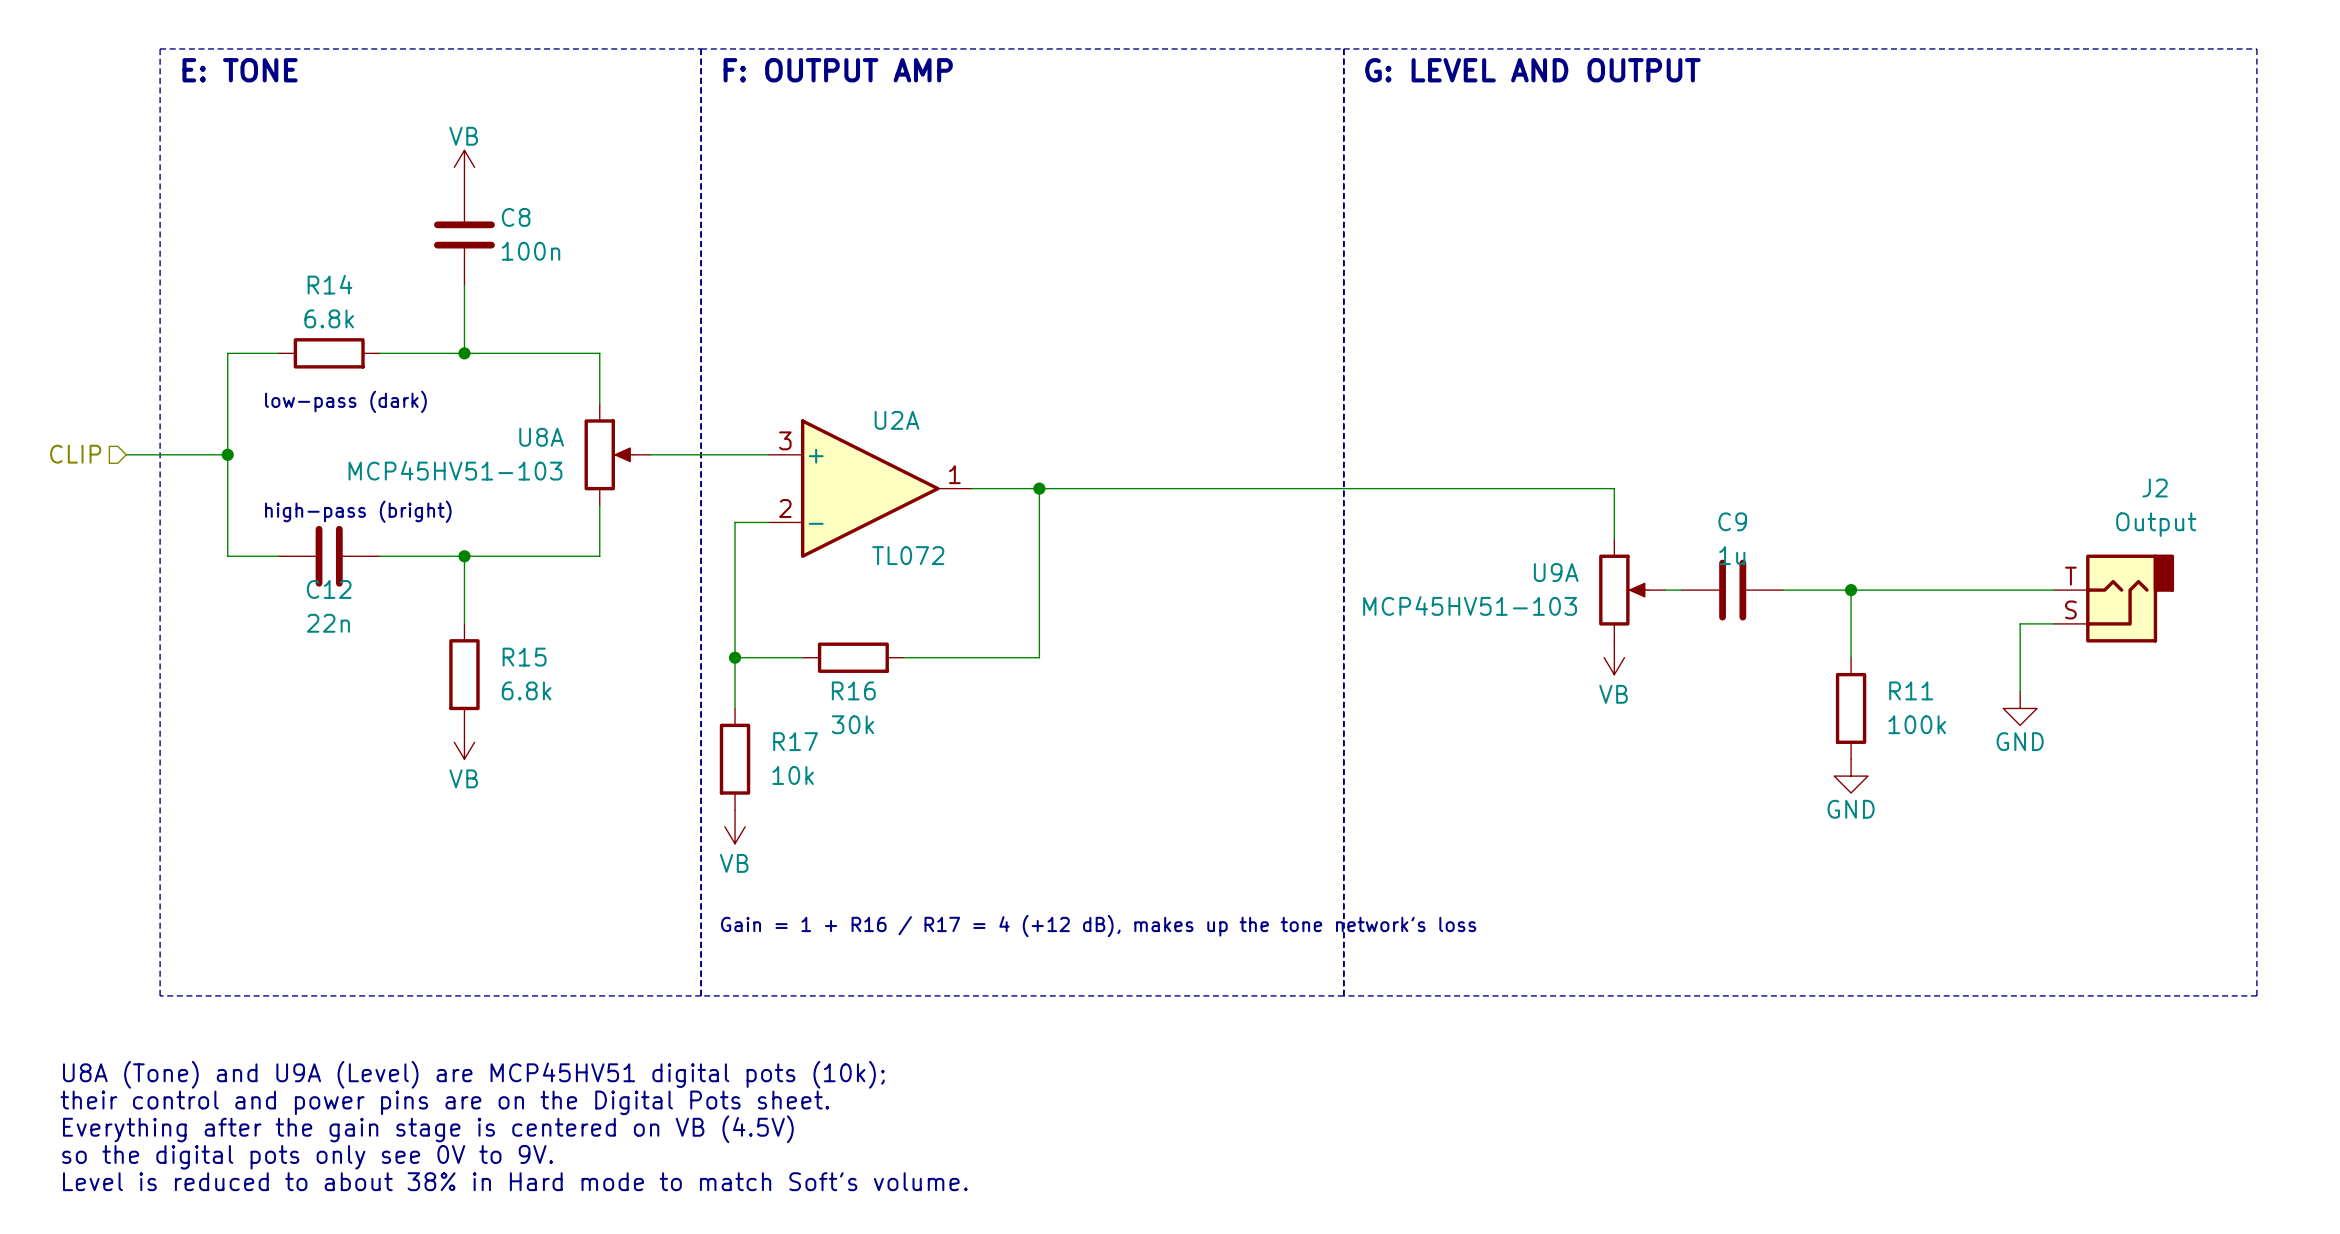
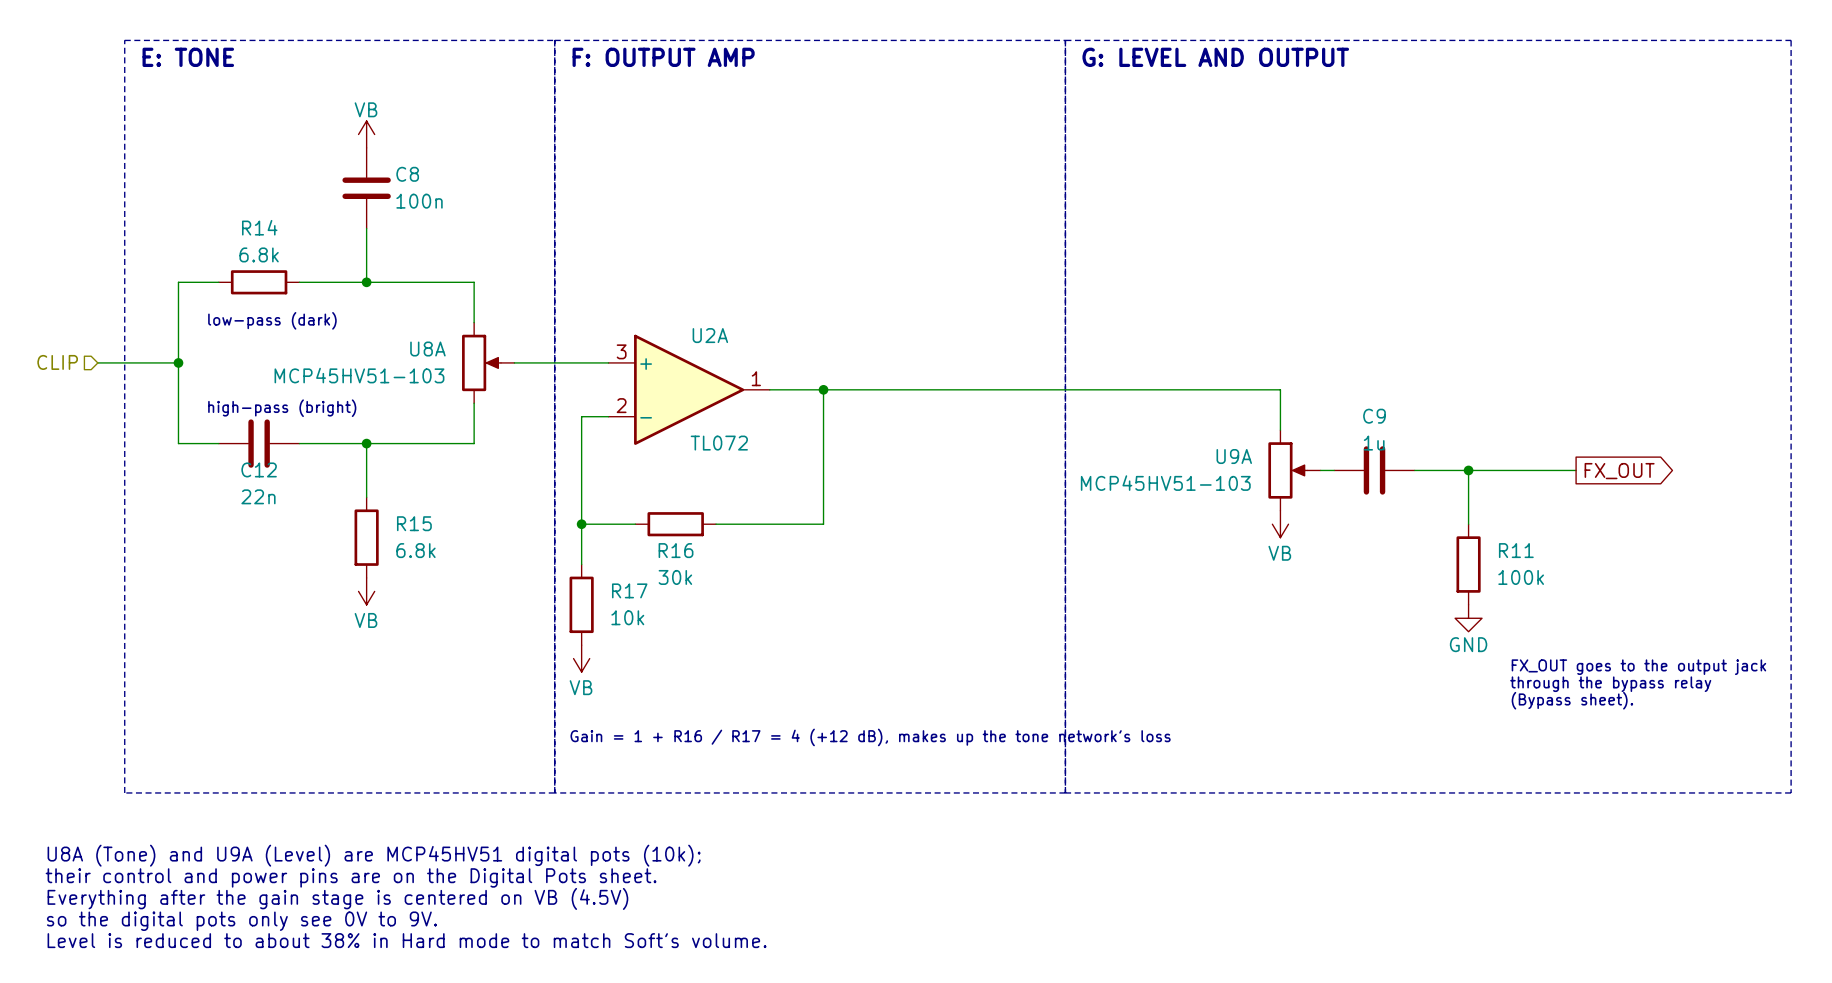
wire: (1986, 590) (2053, 590) -> none
global label: none -> FX_OUT (1619, 471)
J2: Output (2114, 598) -> none
wire: (2053, 623) (2020, 623) (2020, 691) -> none
power symbol: GND (2020, 708) -> none
text: none -> FX_OUT goes to the output jack (1638, 667)
text: none -> through the bypass relay (1610, 684)
text: none -> (Bypass sheet). (1572, 700)

